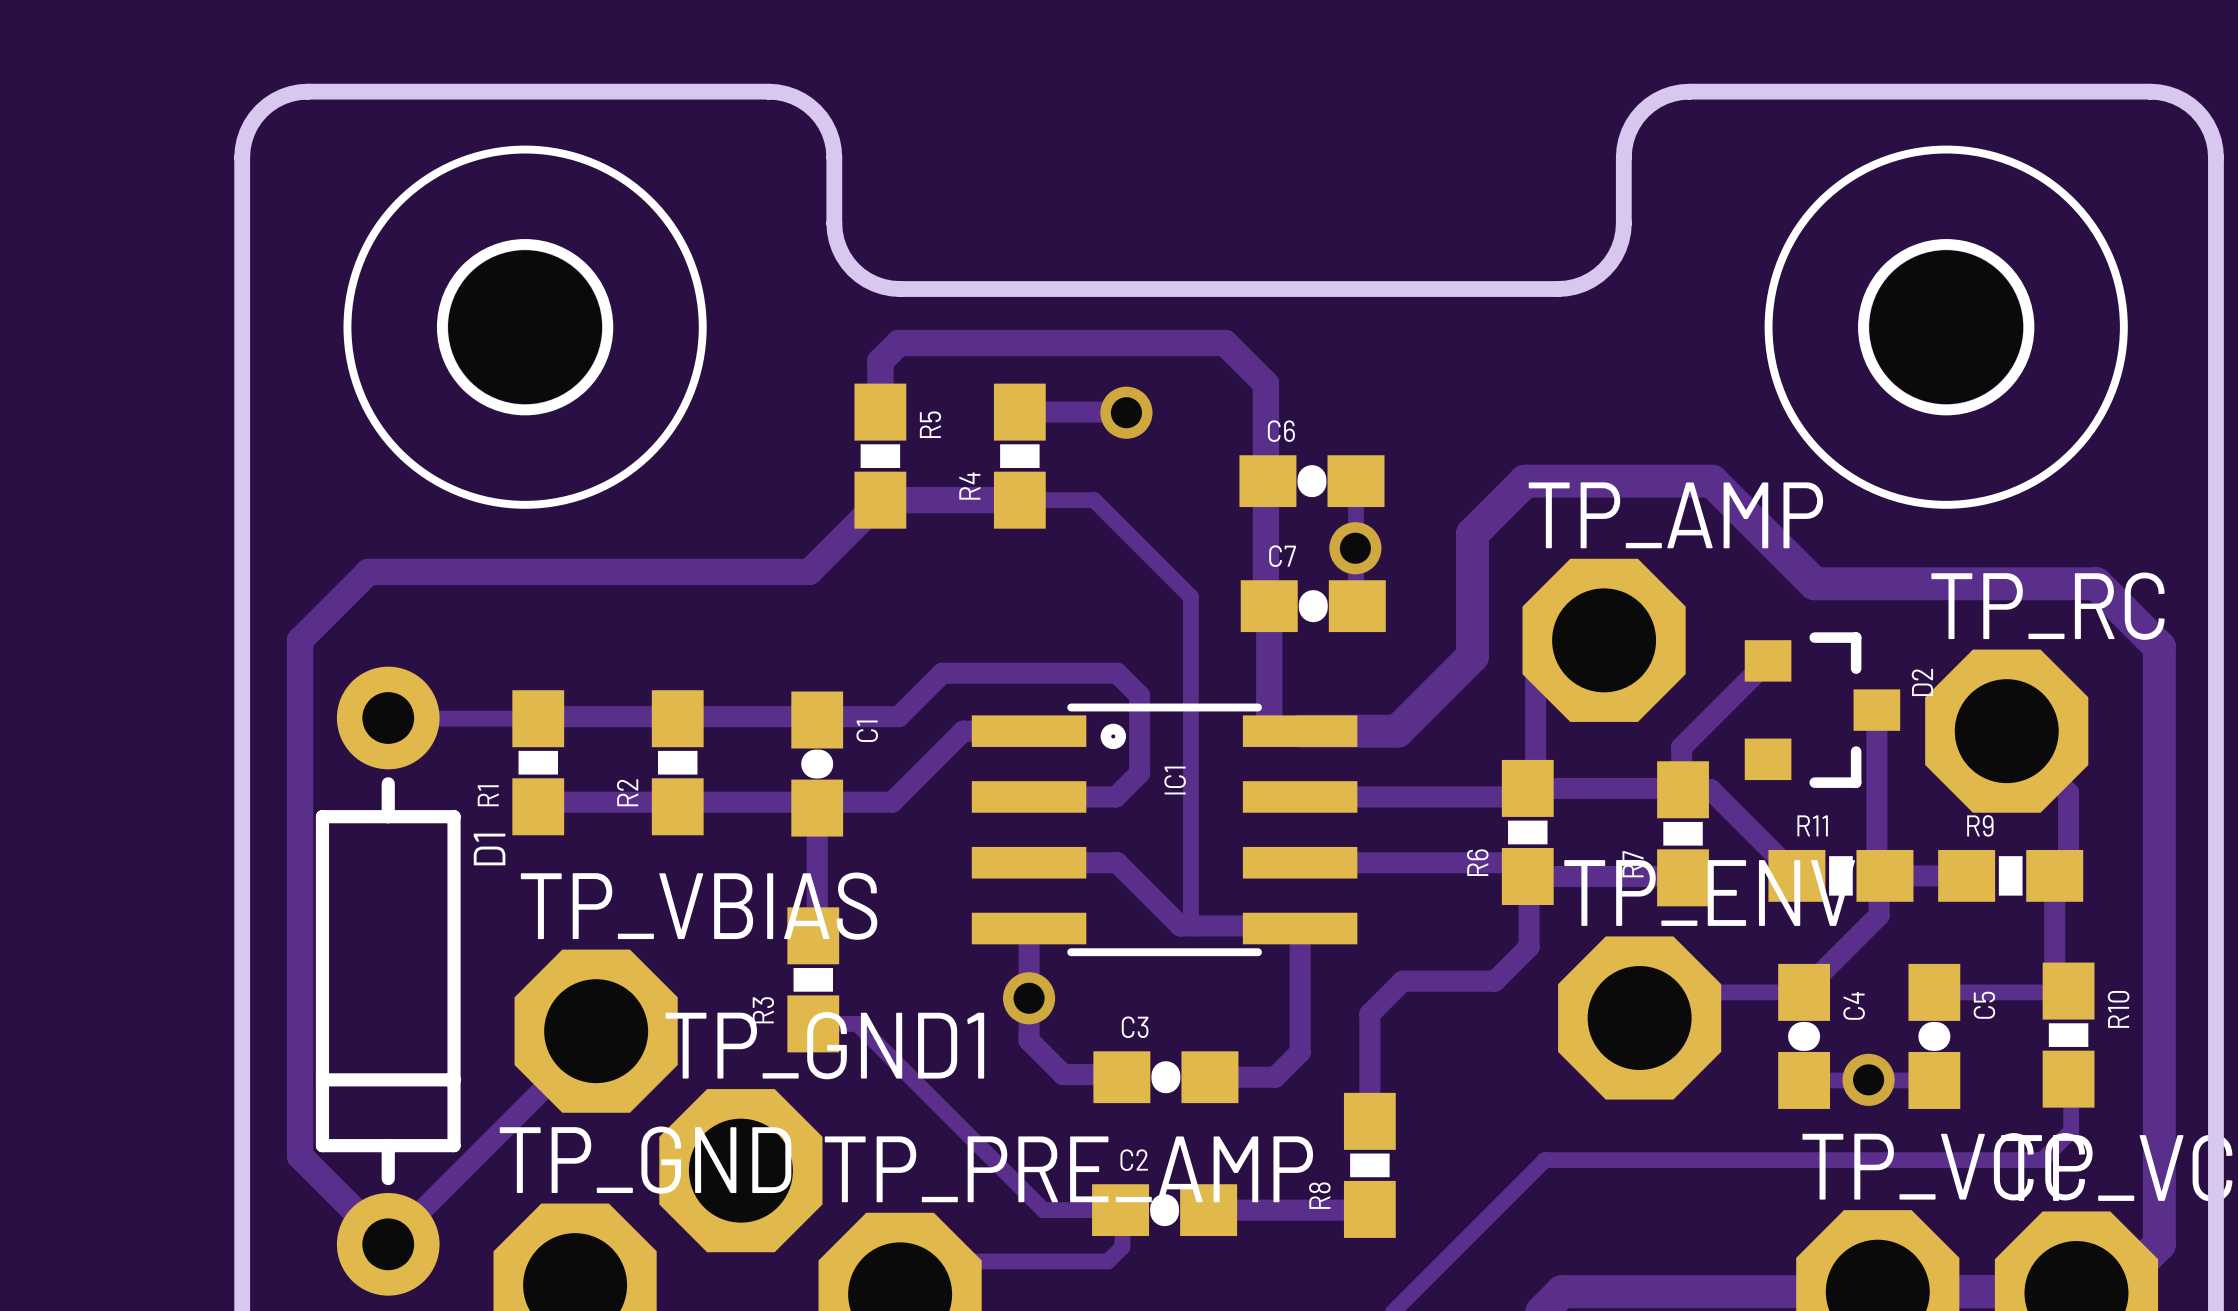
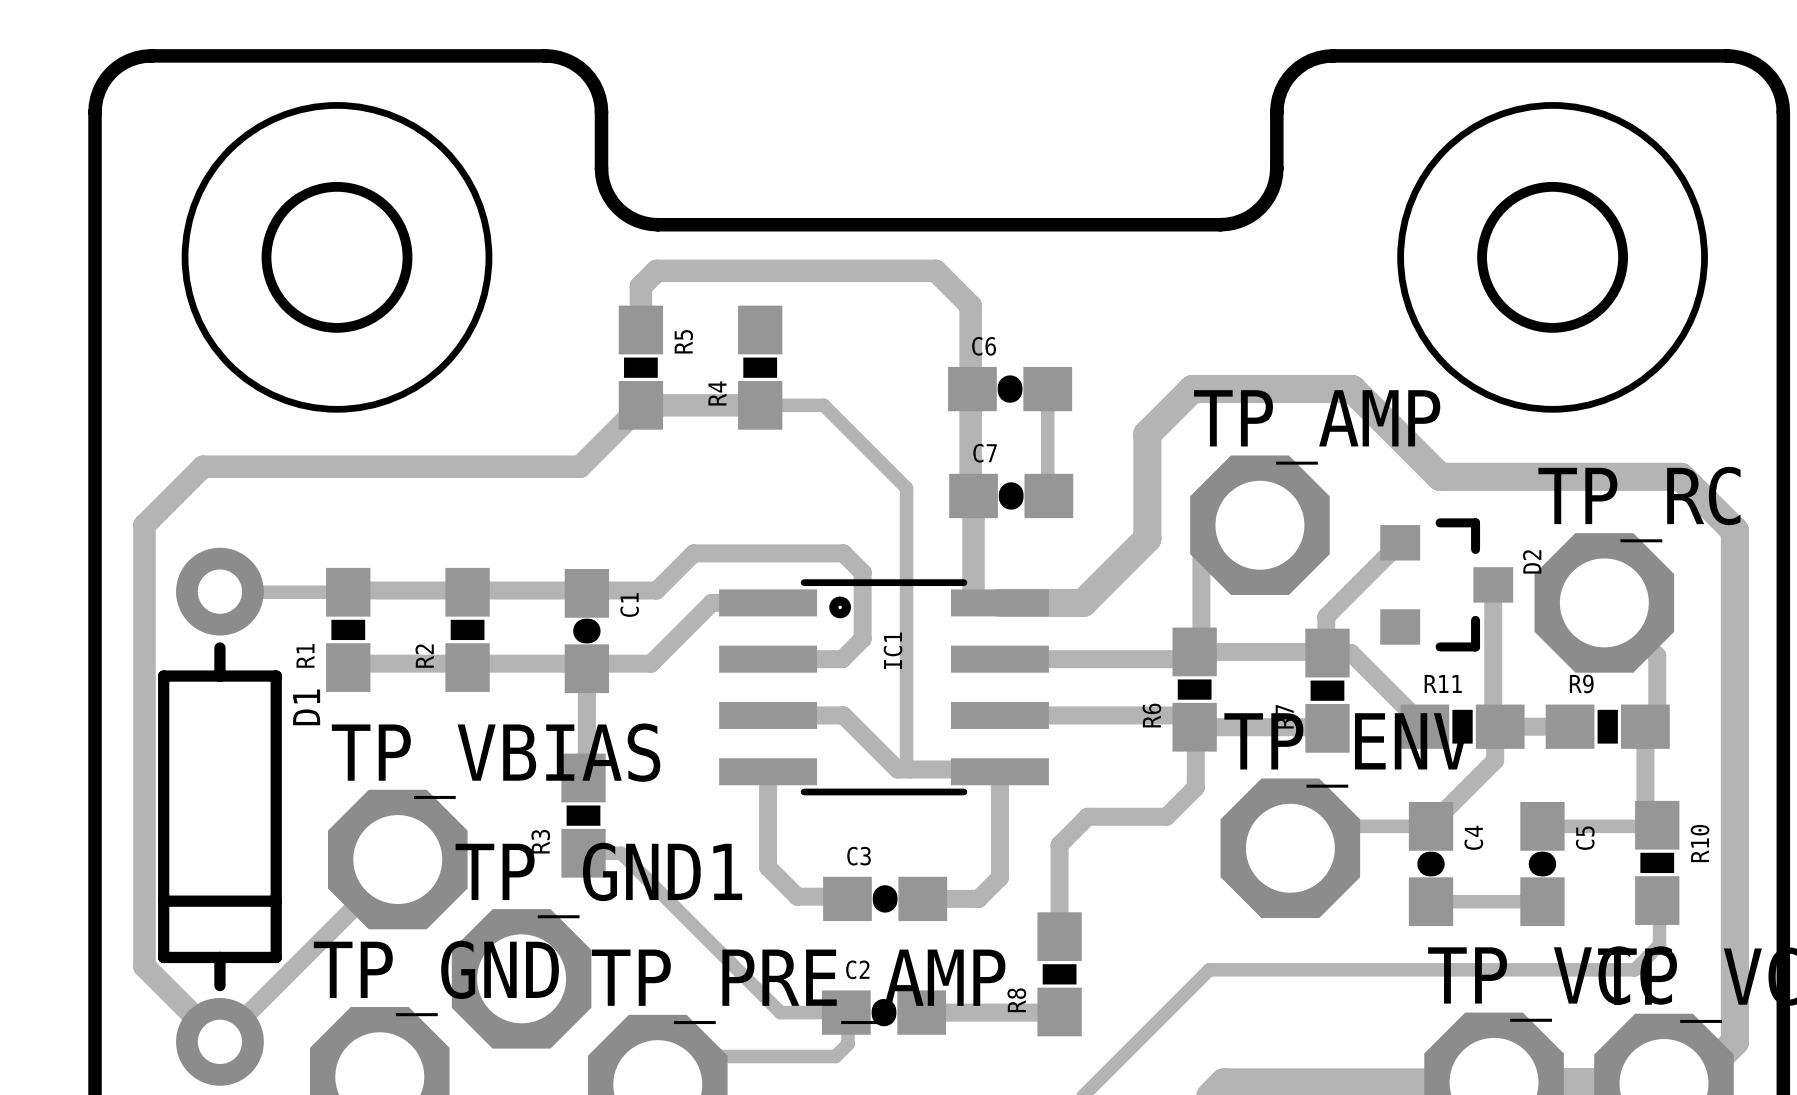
track: (1019, 412) (1128, 412) -> none
via: (1126, 412) -> none
via: (1355, 548) -> none
via: (1029, 998) -> none
via: (1868, 1079) -> none

